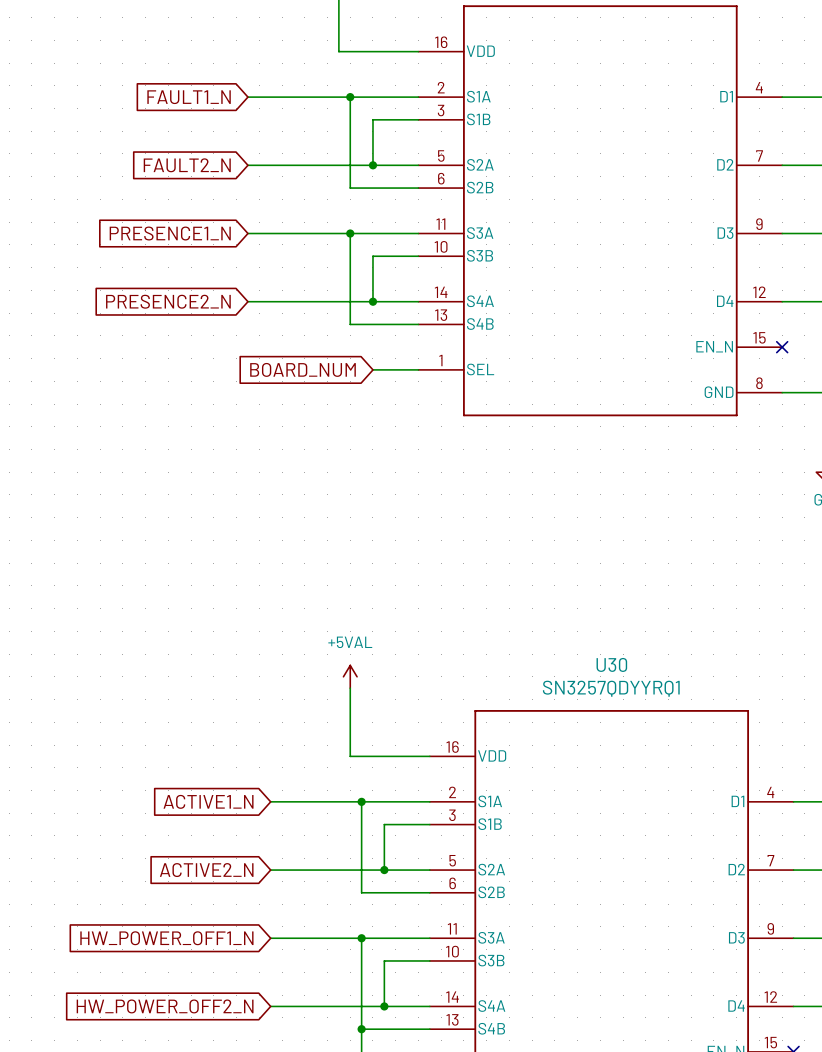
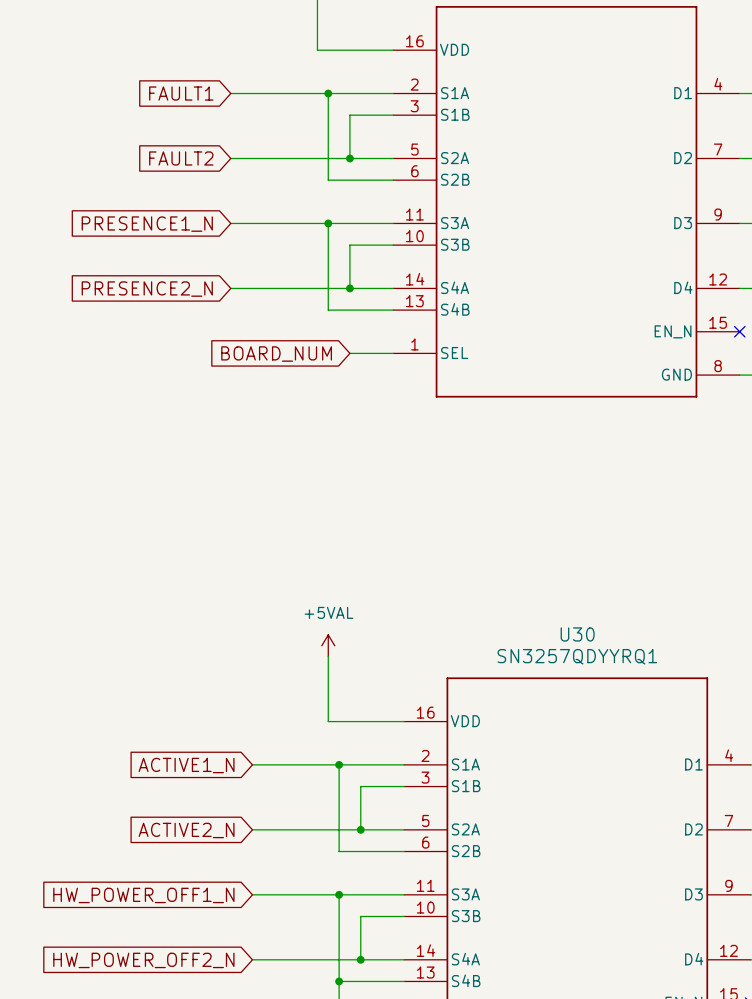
global label: FAULT1_N (189, 97) -> FAULT1 (181, 93)
global label: FAULT2_N (187, 165) -> FAULT2 (181, 158)

